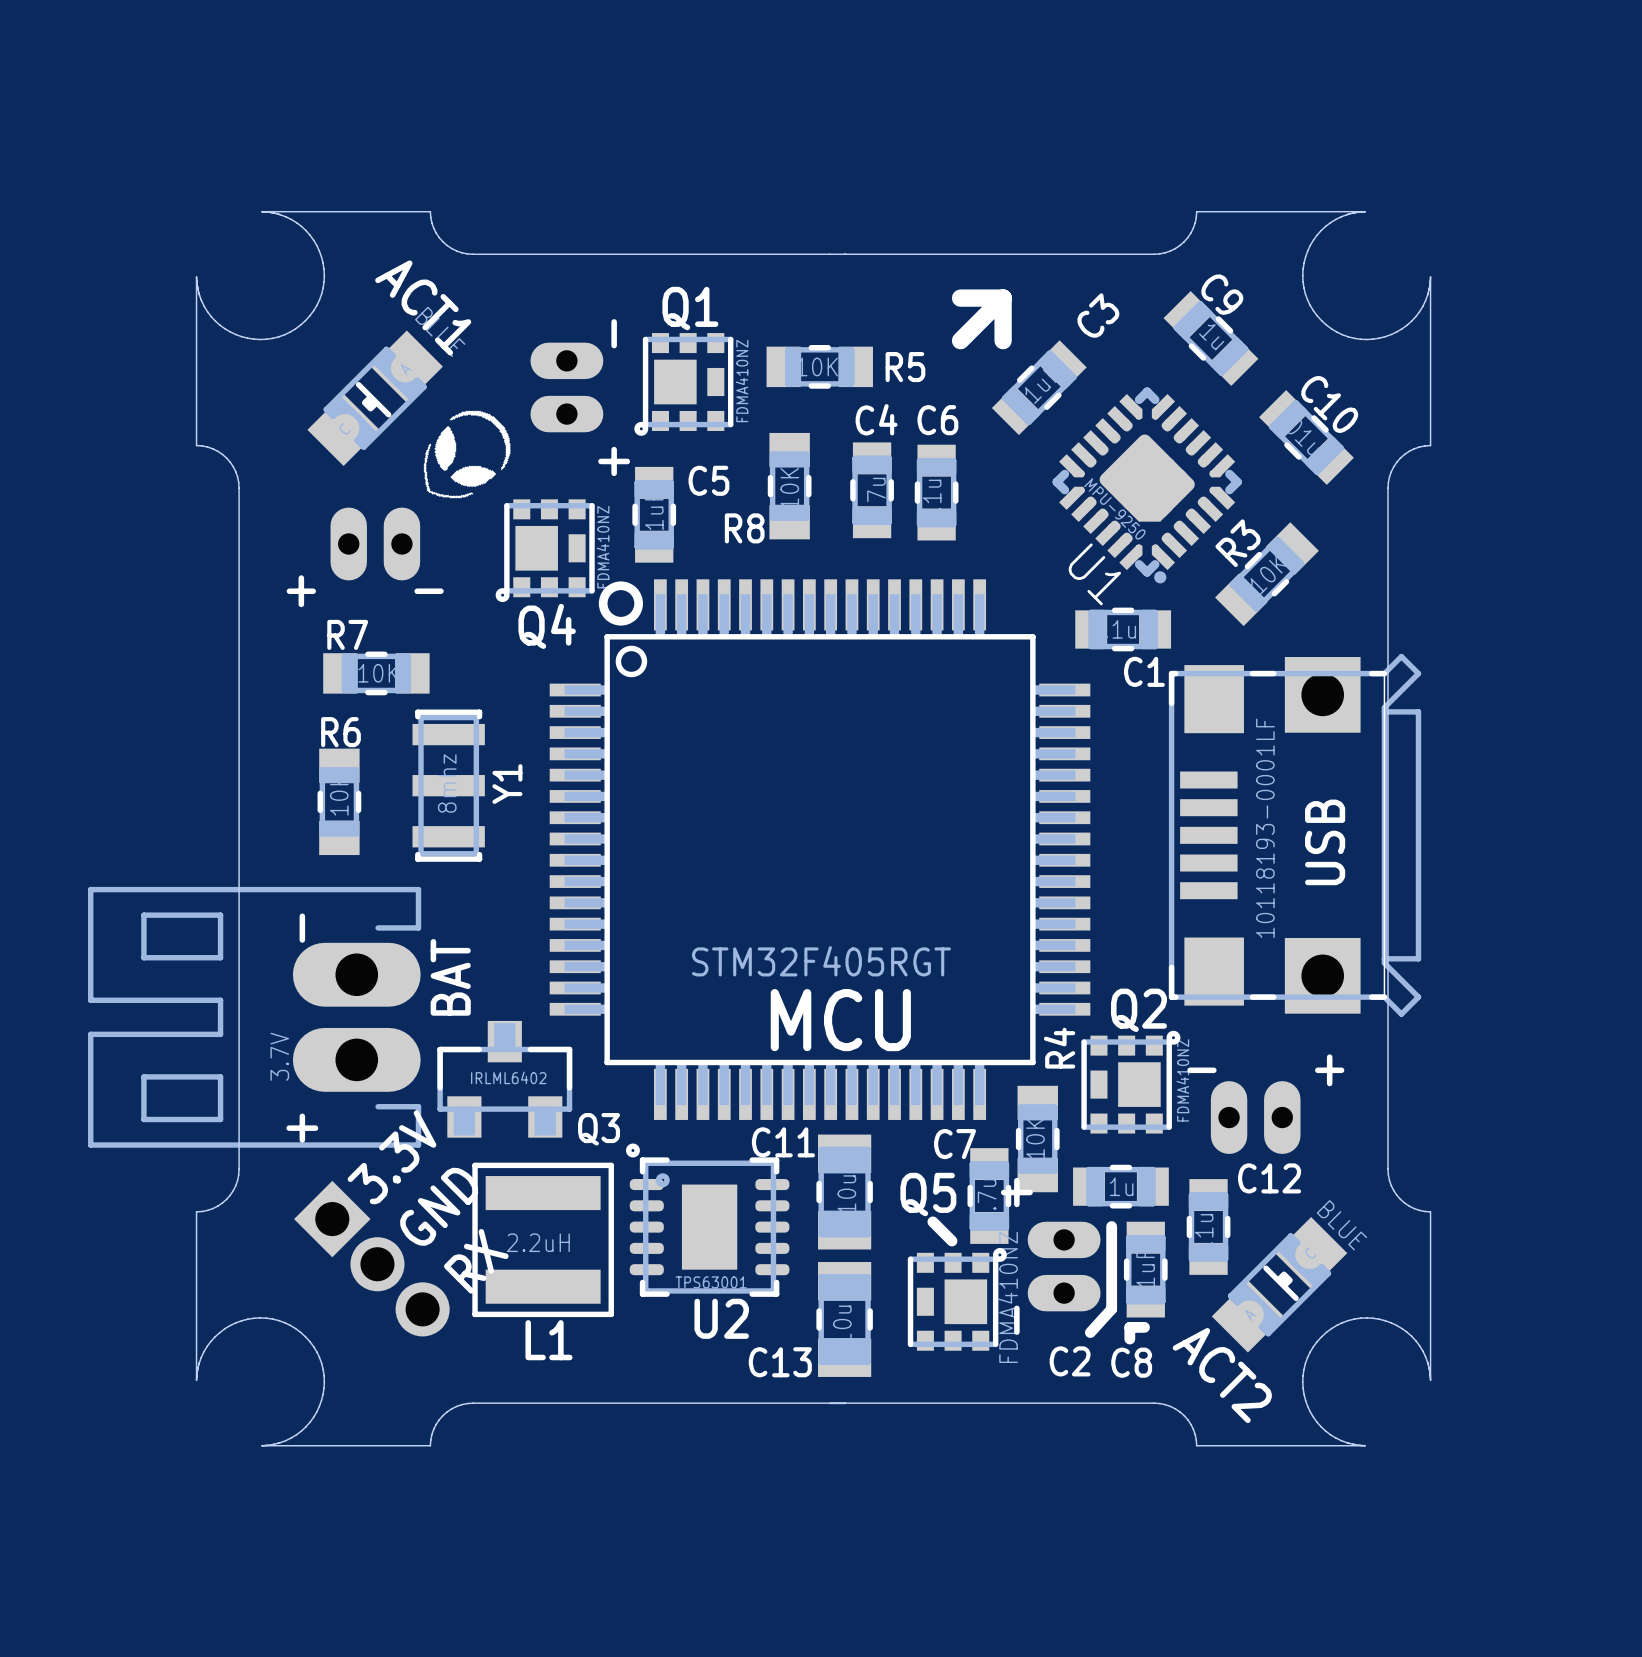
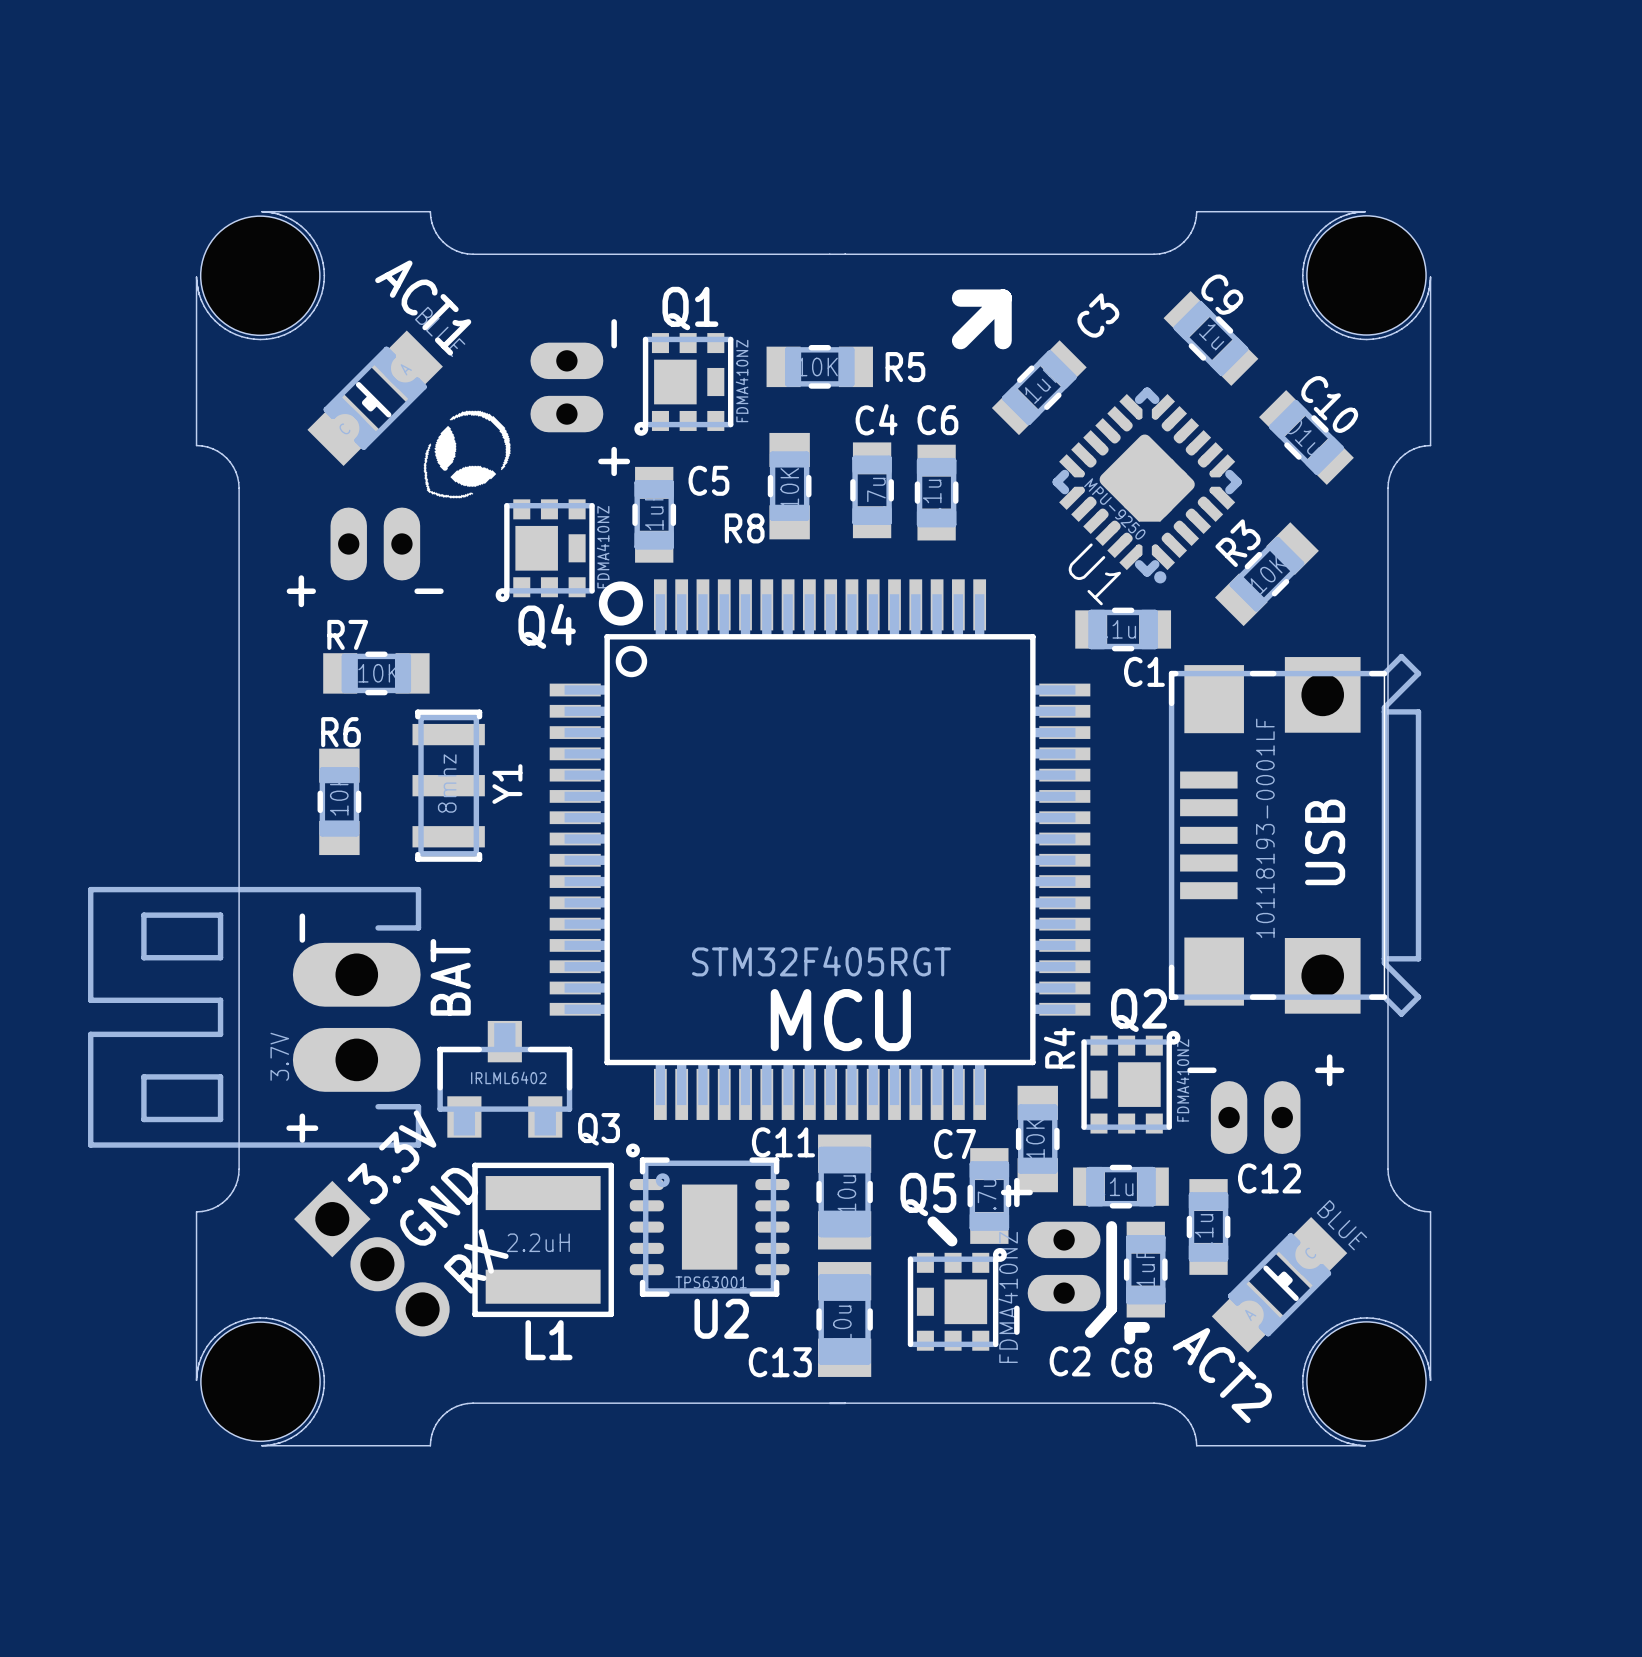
hole: none -> (260, 275)
hole: none -> (1366, 275)
hole: none -> (260, 1381)
hole: none -> (1366, 1381)

